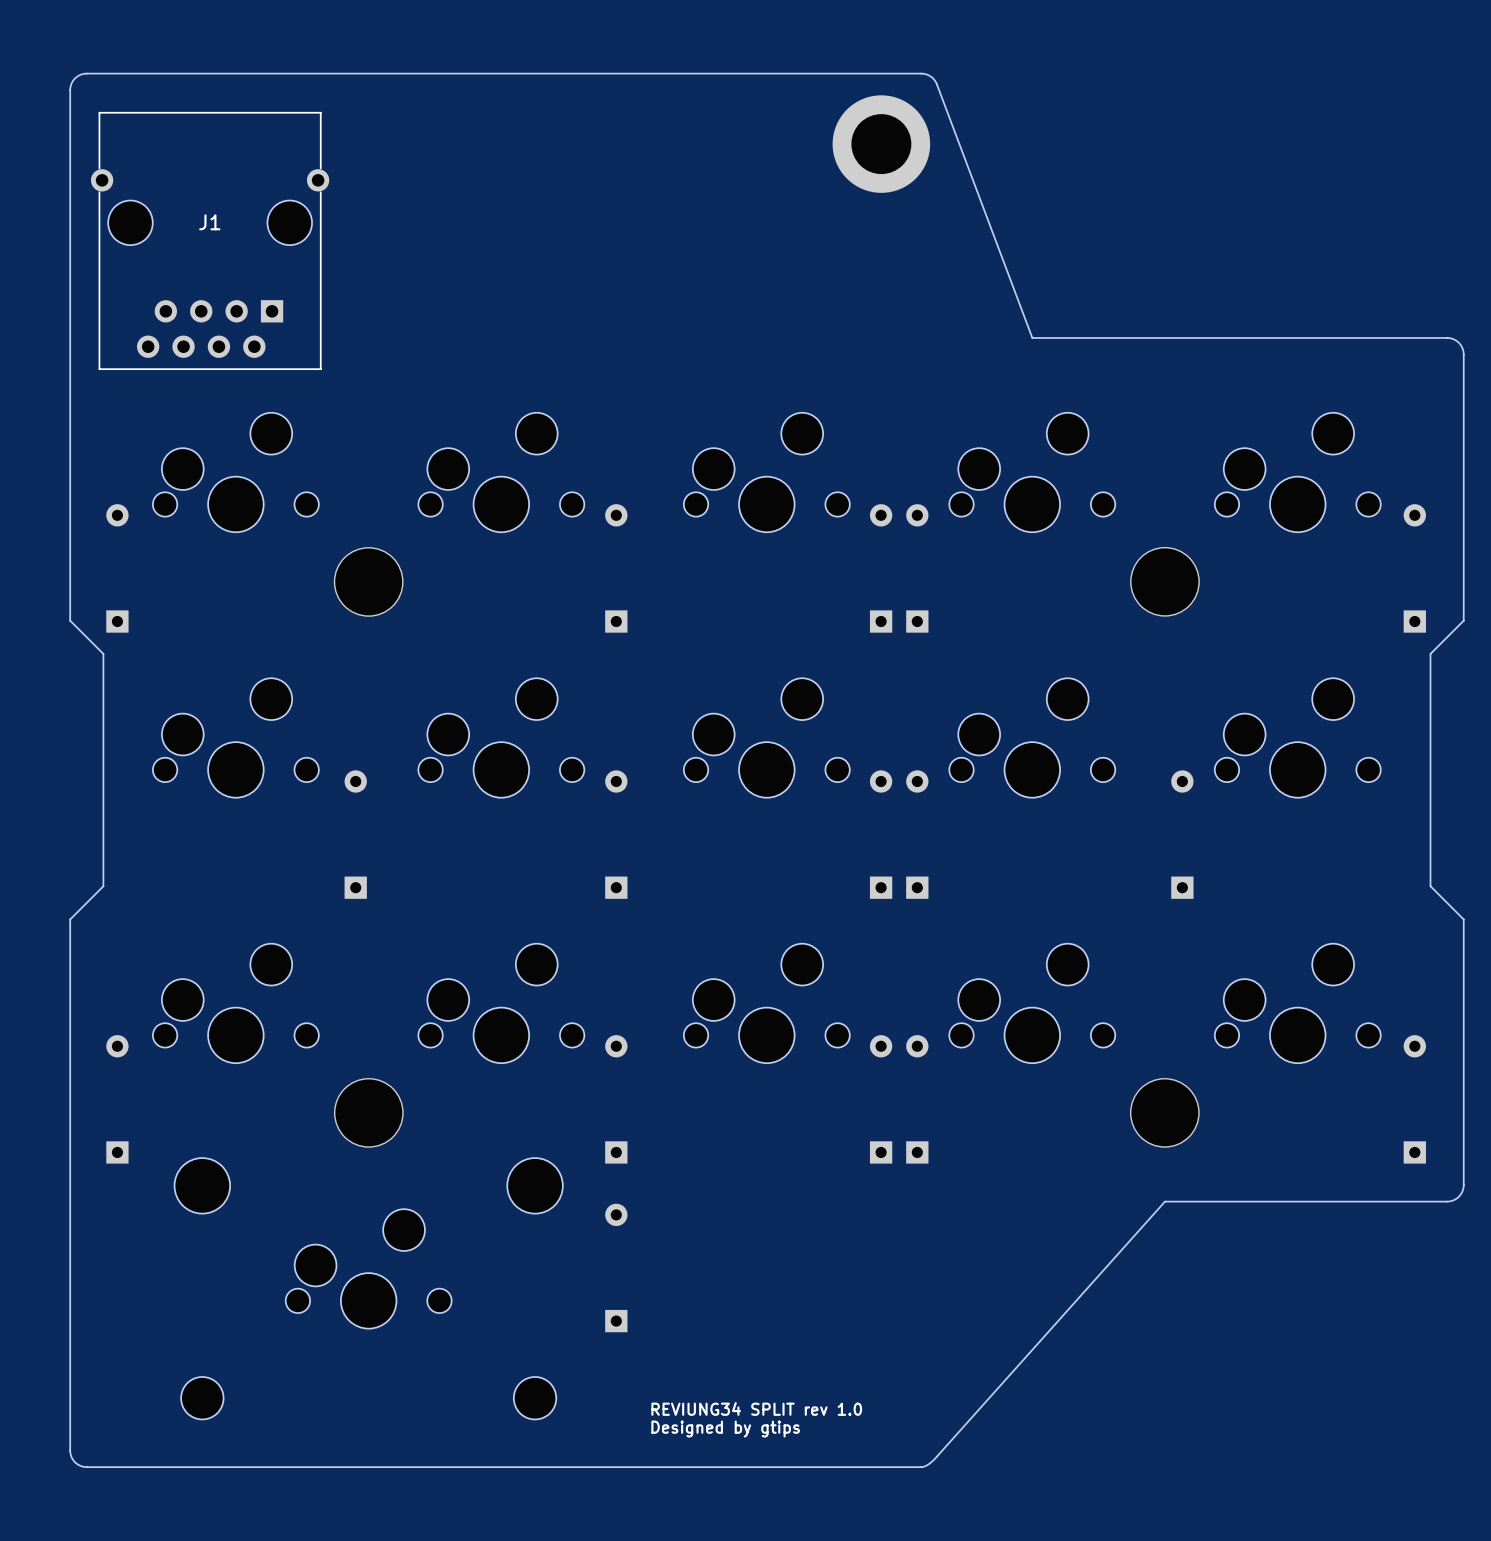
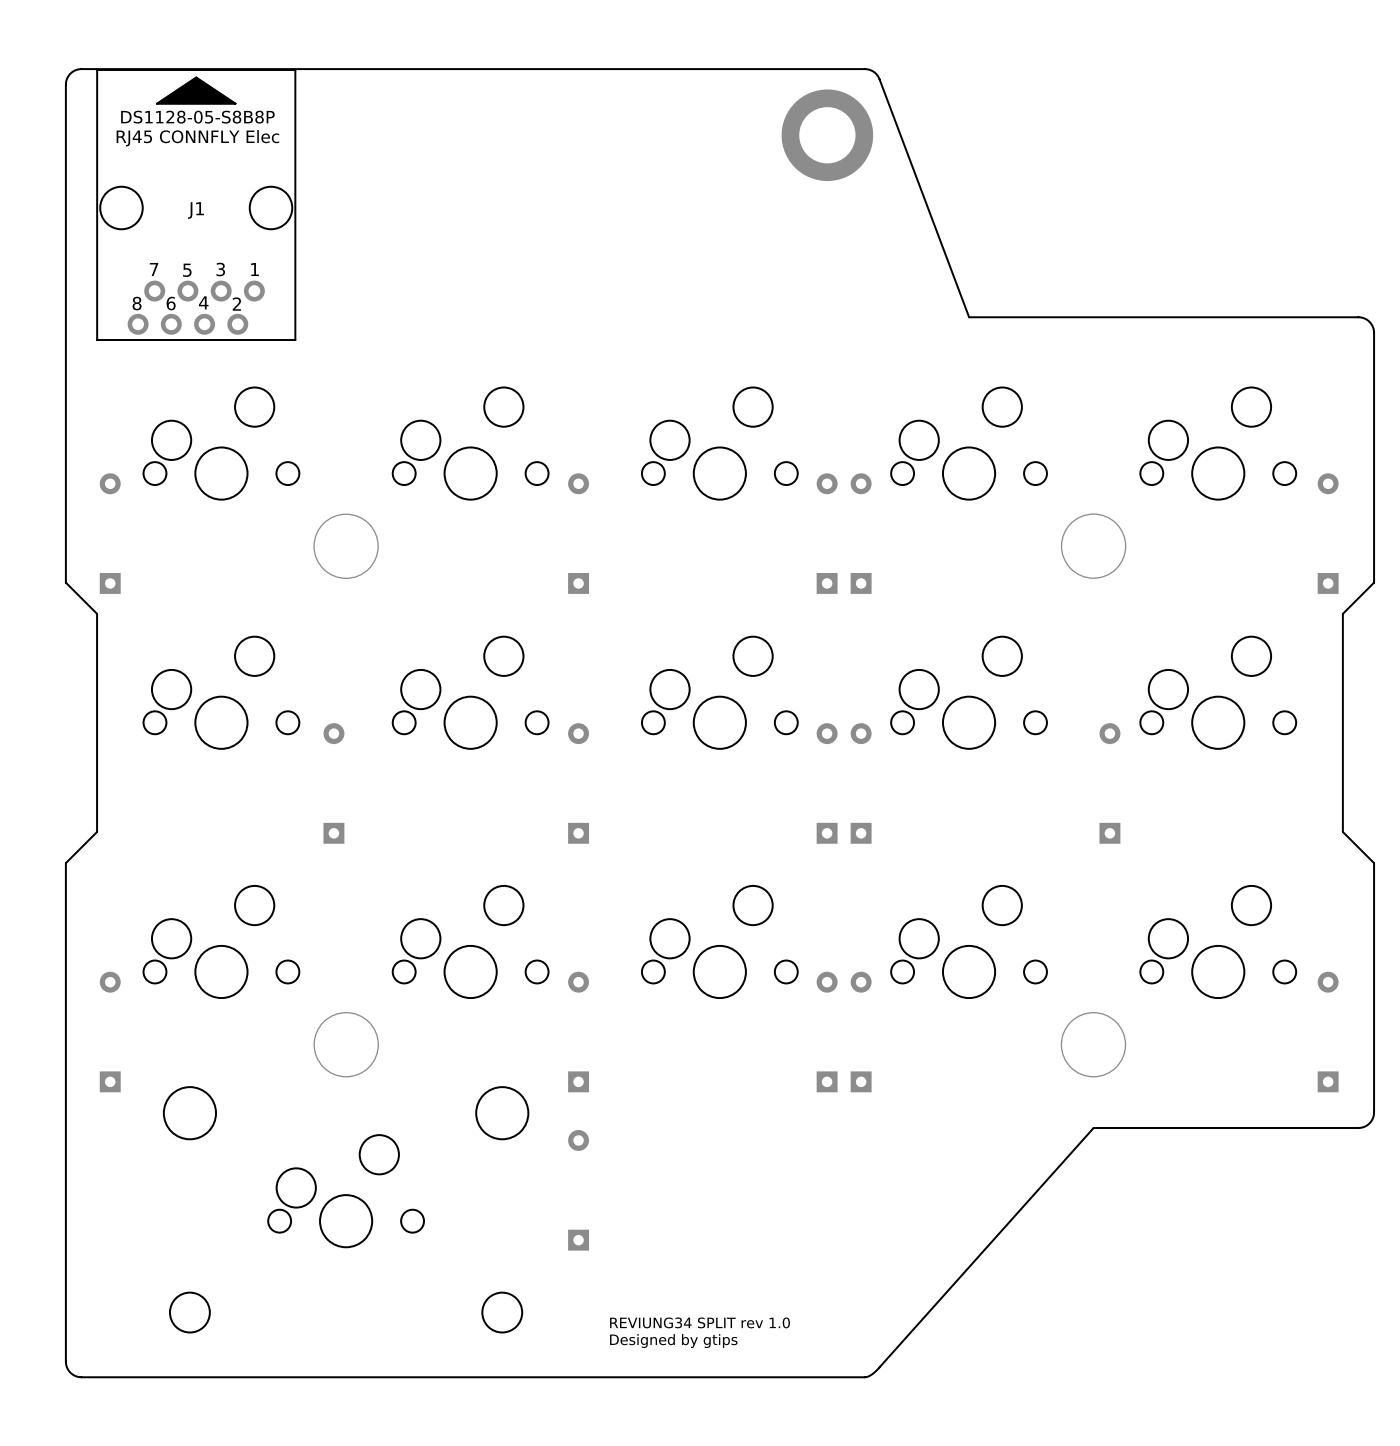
J1 footprint: [90, 111, 330, 370] -> [96, 69, 297, 341]

